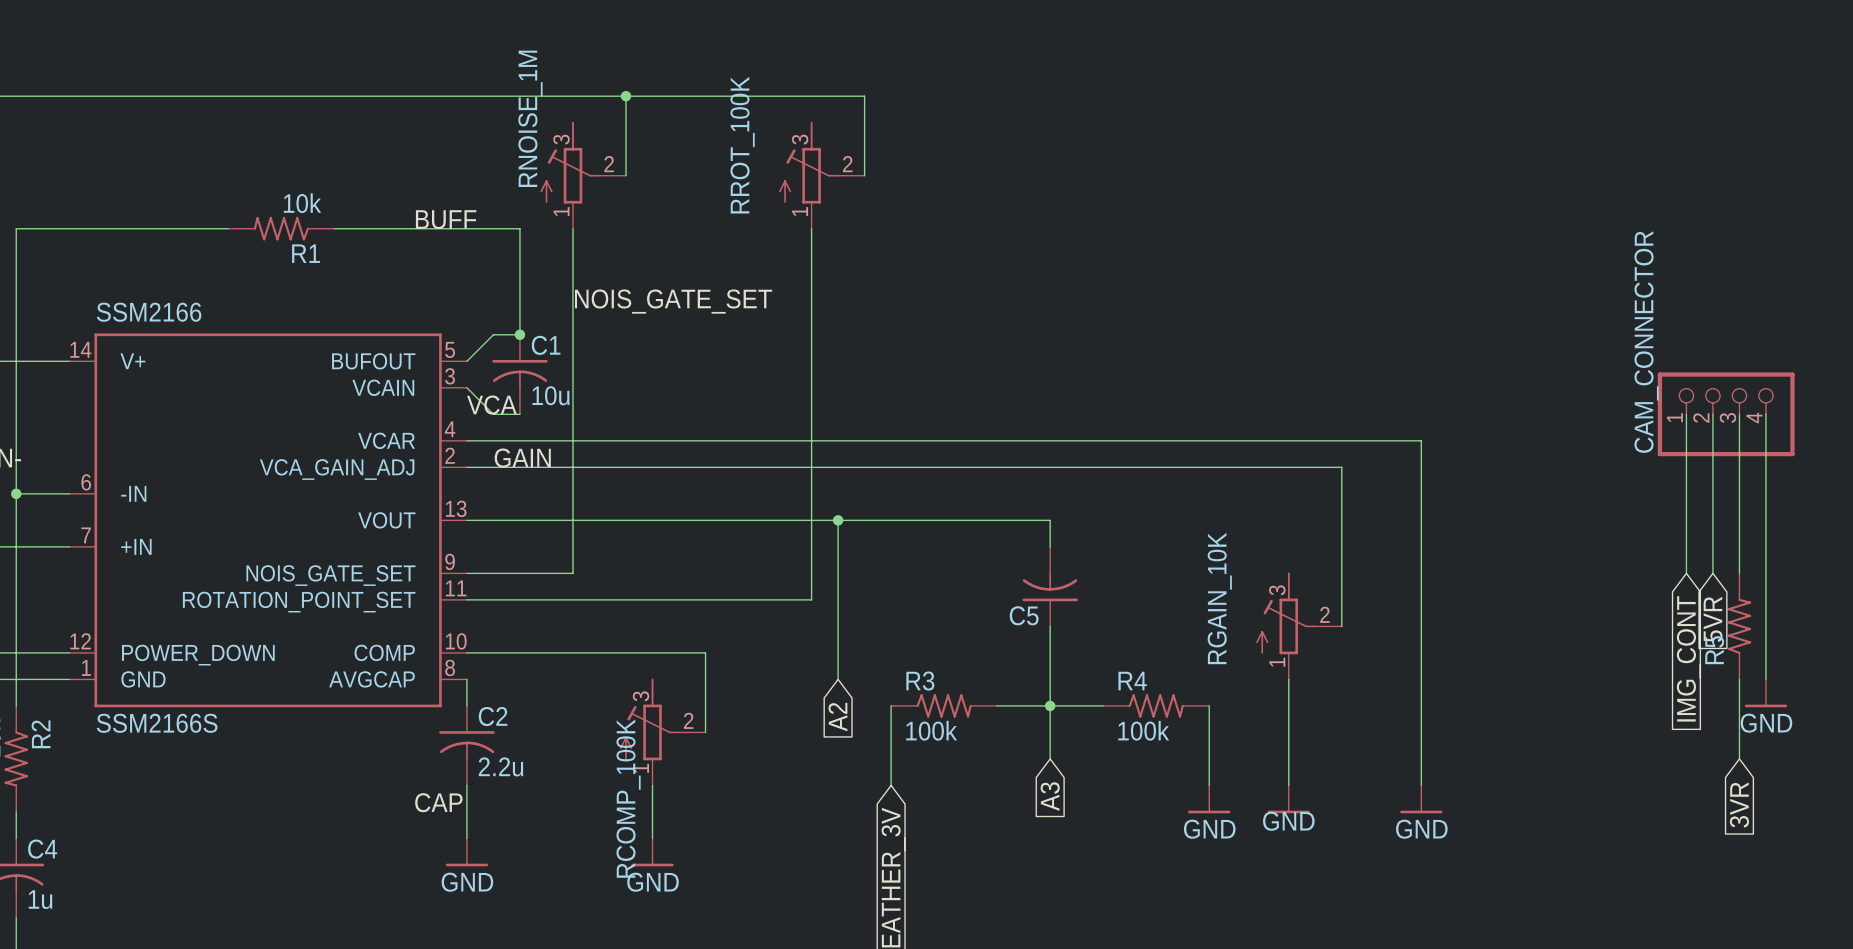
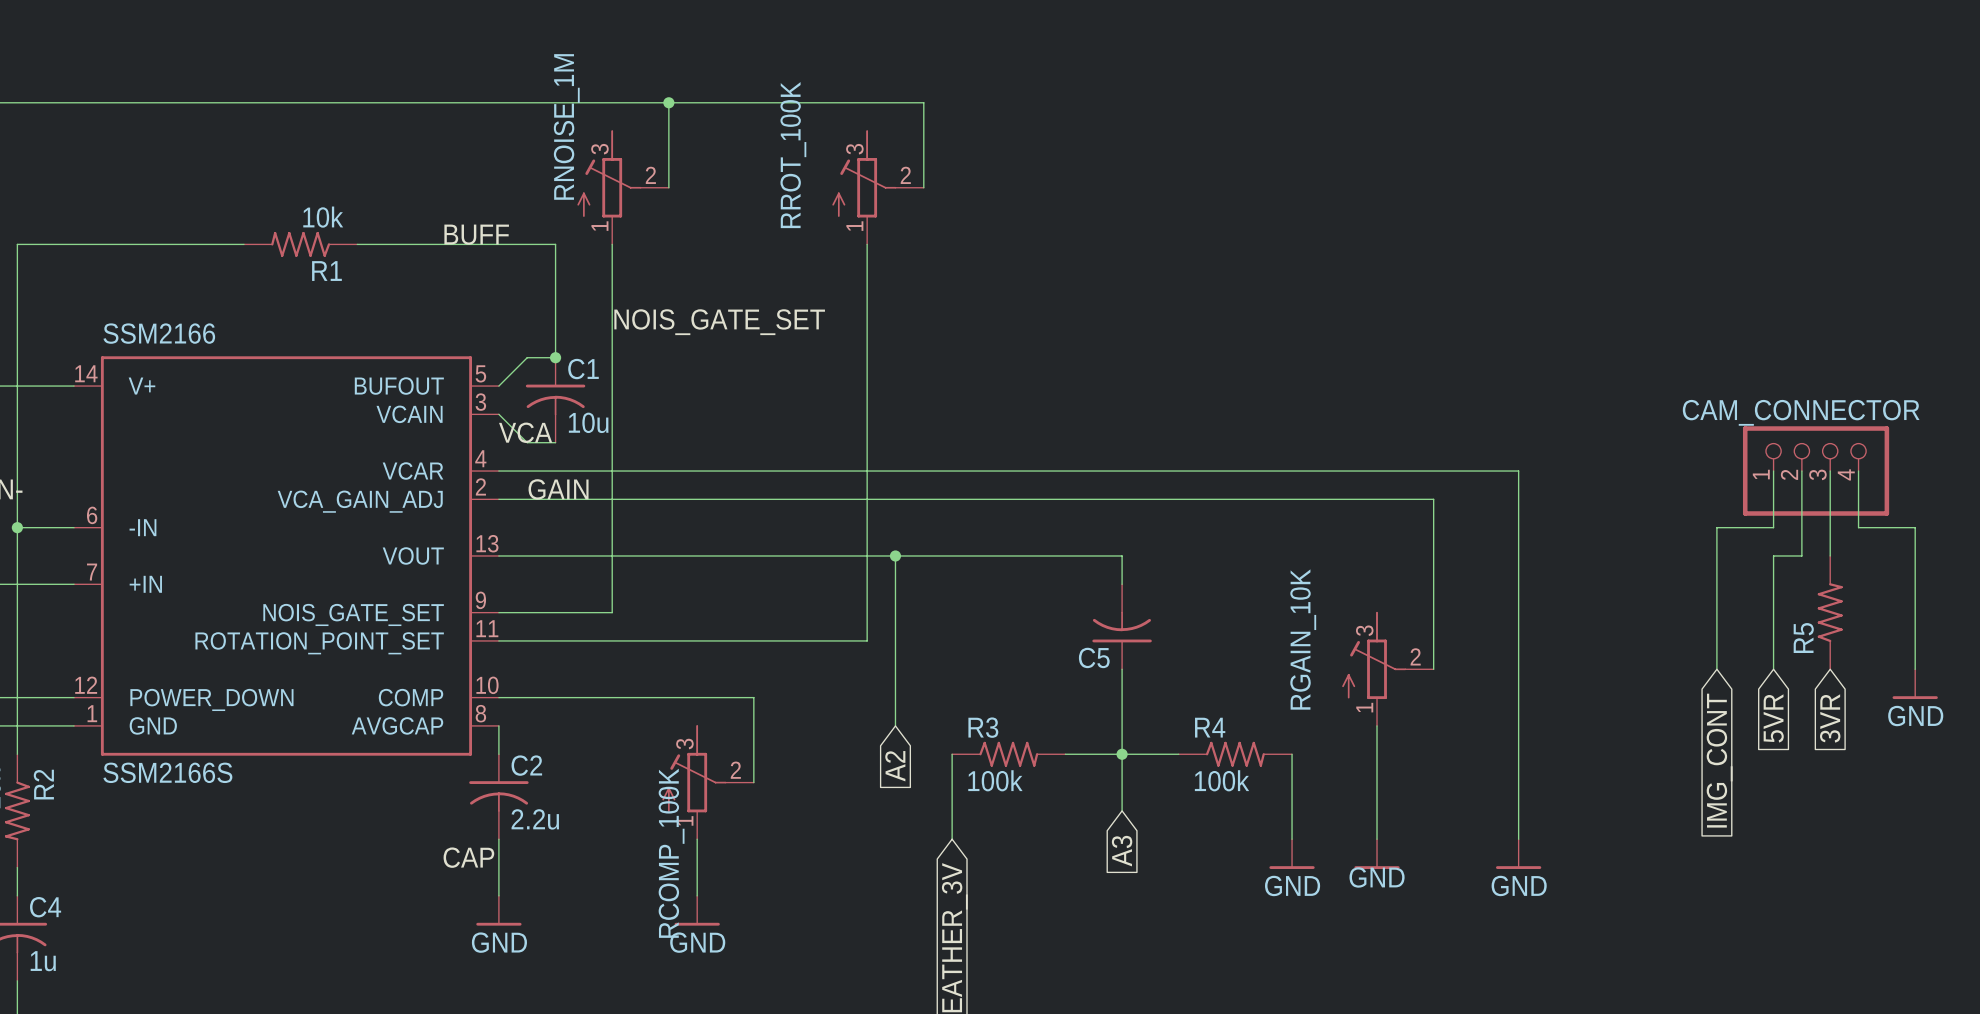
CAM_CONNECTOR name rotation: 0° (1646, 342) -> 90° clockwise (1801, 412)
wire: (1686, 414) (1686, 440) -> none
wire: (1712, 414) (1712, 440) -> none
CAM_CONNECTOR position: (1726, 414) -> (1816, 471)
wire: (1739, 414) (1739, 440) -> none
wire: (1765, 414) (1765, 679) -> none
wire: none -> (1773, 471) (1773, 527) (1716, 527) (1716, 669)
wire: (1739, 493) (1739, 573) -> (1858, 527) (1915, 527) (1915, 669)
wire: (1686, 520) (1686, 573) -> (1801, 555) (1773, 555) (1773, 669)
global label position: 5VR (1713, 619) -> 5VR (1773, 718)
R5 position: (1739, 626) -> (1830, 612)
global label position: IMG_CONT (1688, 658) -> IMG_CONT (1719, 760)
wire: (1739, 679) (1739, 758) -> none
power symbol position: GND (1765, 693) -> GND (1915, 684)
global label position: 3VR (1739, 804) -> 3VR (1830, 718)

